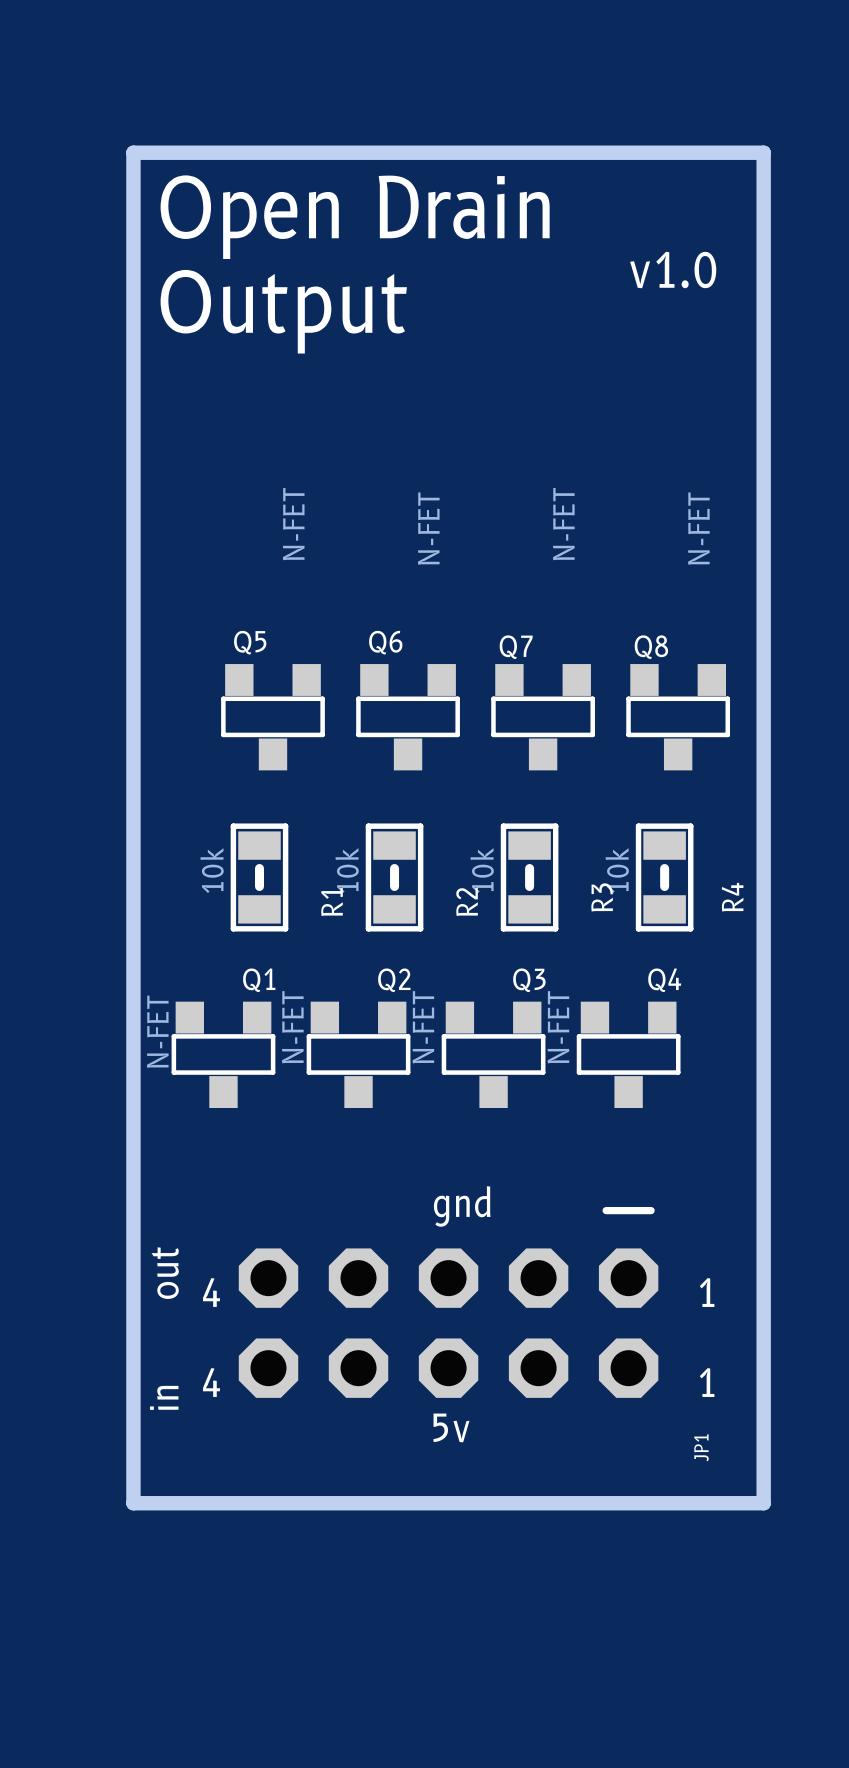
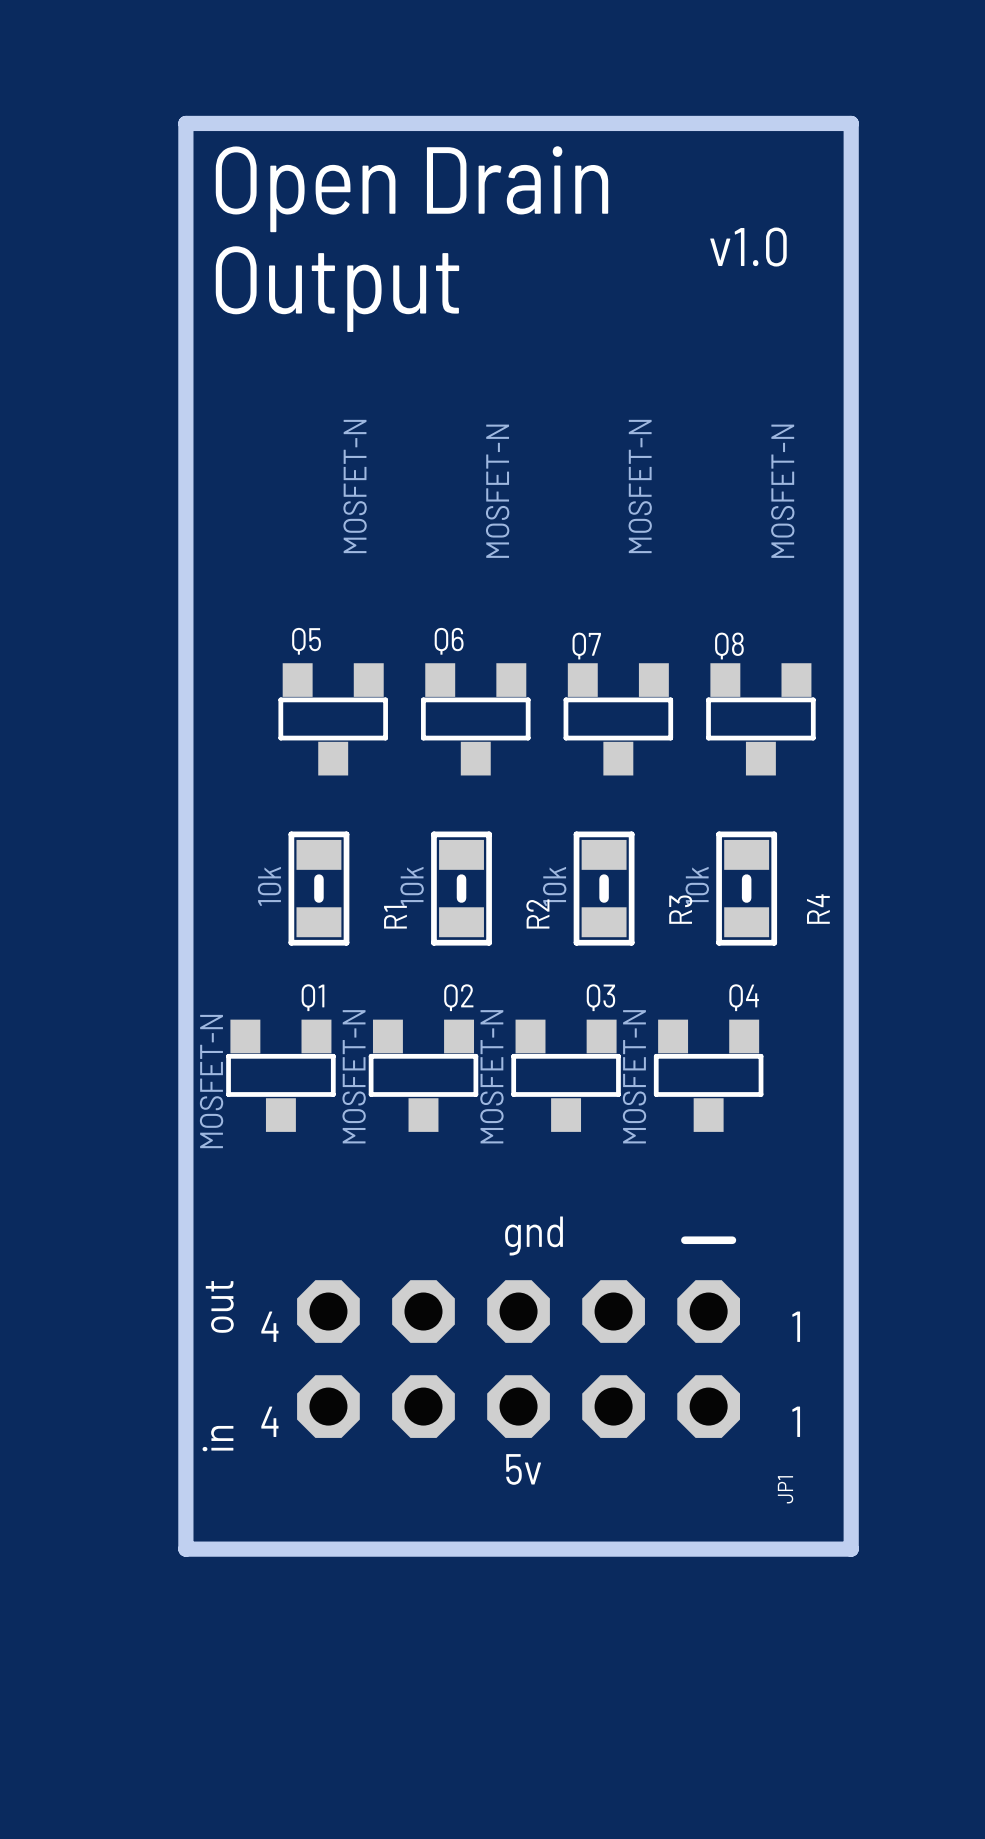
Q5 value: N-FET (293, 524) -> MOSFET-N (355, 486)
Q7 value: N-FET (563, 524) -> MOSFET-N (640, 486)
Q6 value: N-FET (428, 528) -> MOSFET-N (497, 491)
Q8 value: N-FET (698, 528) -> MOSFET-N (782, 491)
Q2 value: N-FET (292, 1027) -> MOSFET-N (354, 1076)
Q3 value: N-FET (423, 1027) -> MOSFET-N (491, 1076)
Q4 value: N-FET (558, 1027) -> MOSFET-N (634, 1076)
Q1 value: N-FET (157, 1031) -> MOSFET-N (211, 1081)

